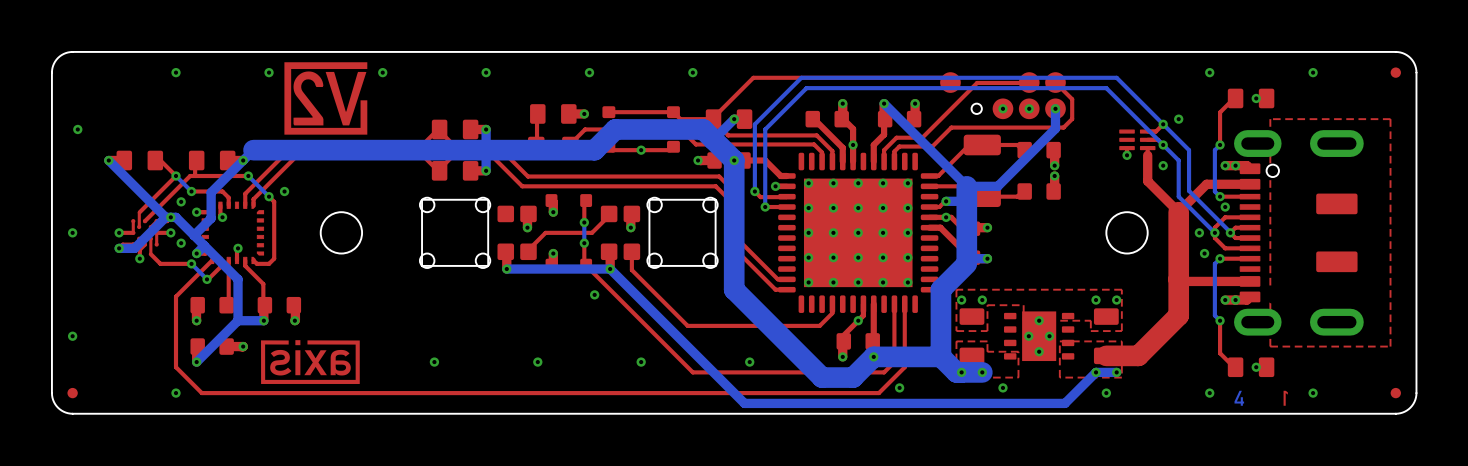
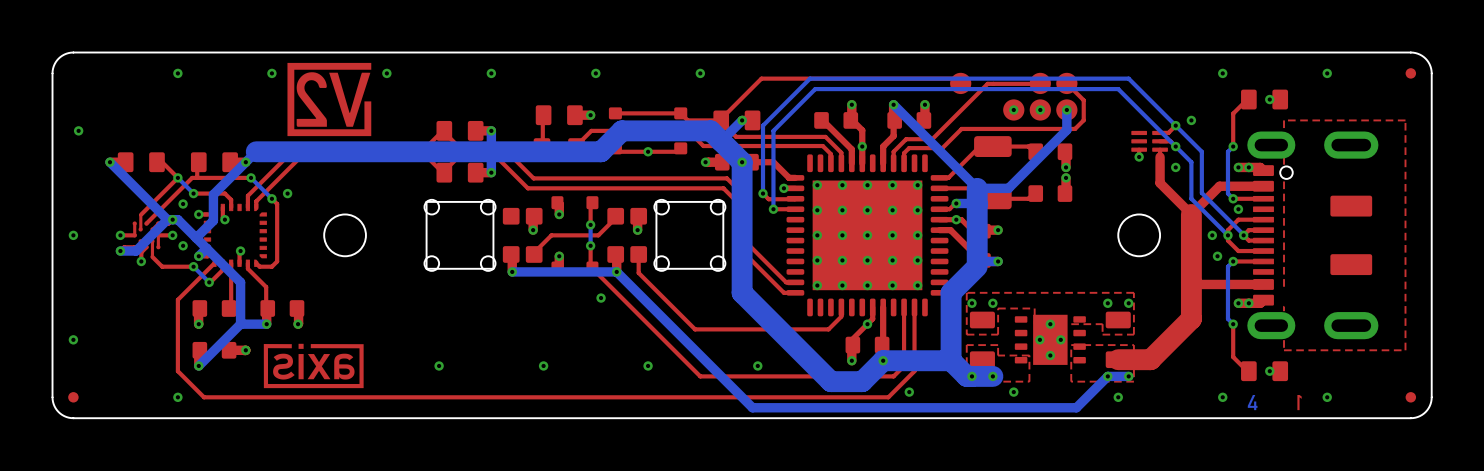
part footprint: [940, 72, 1066, 120] -> [950, 72, 1078, 121]

